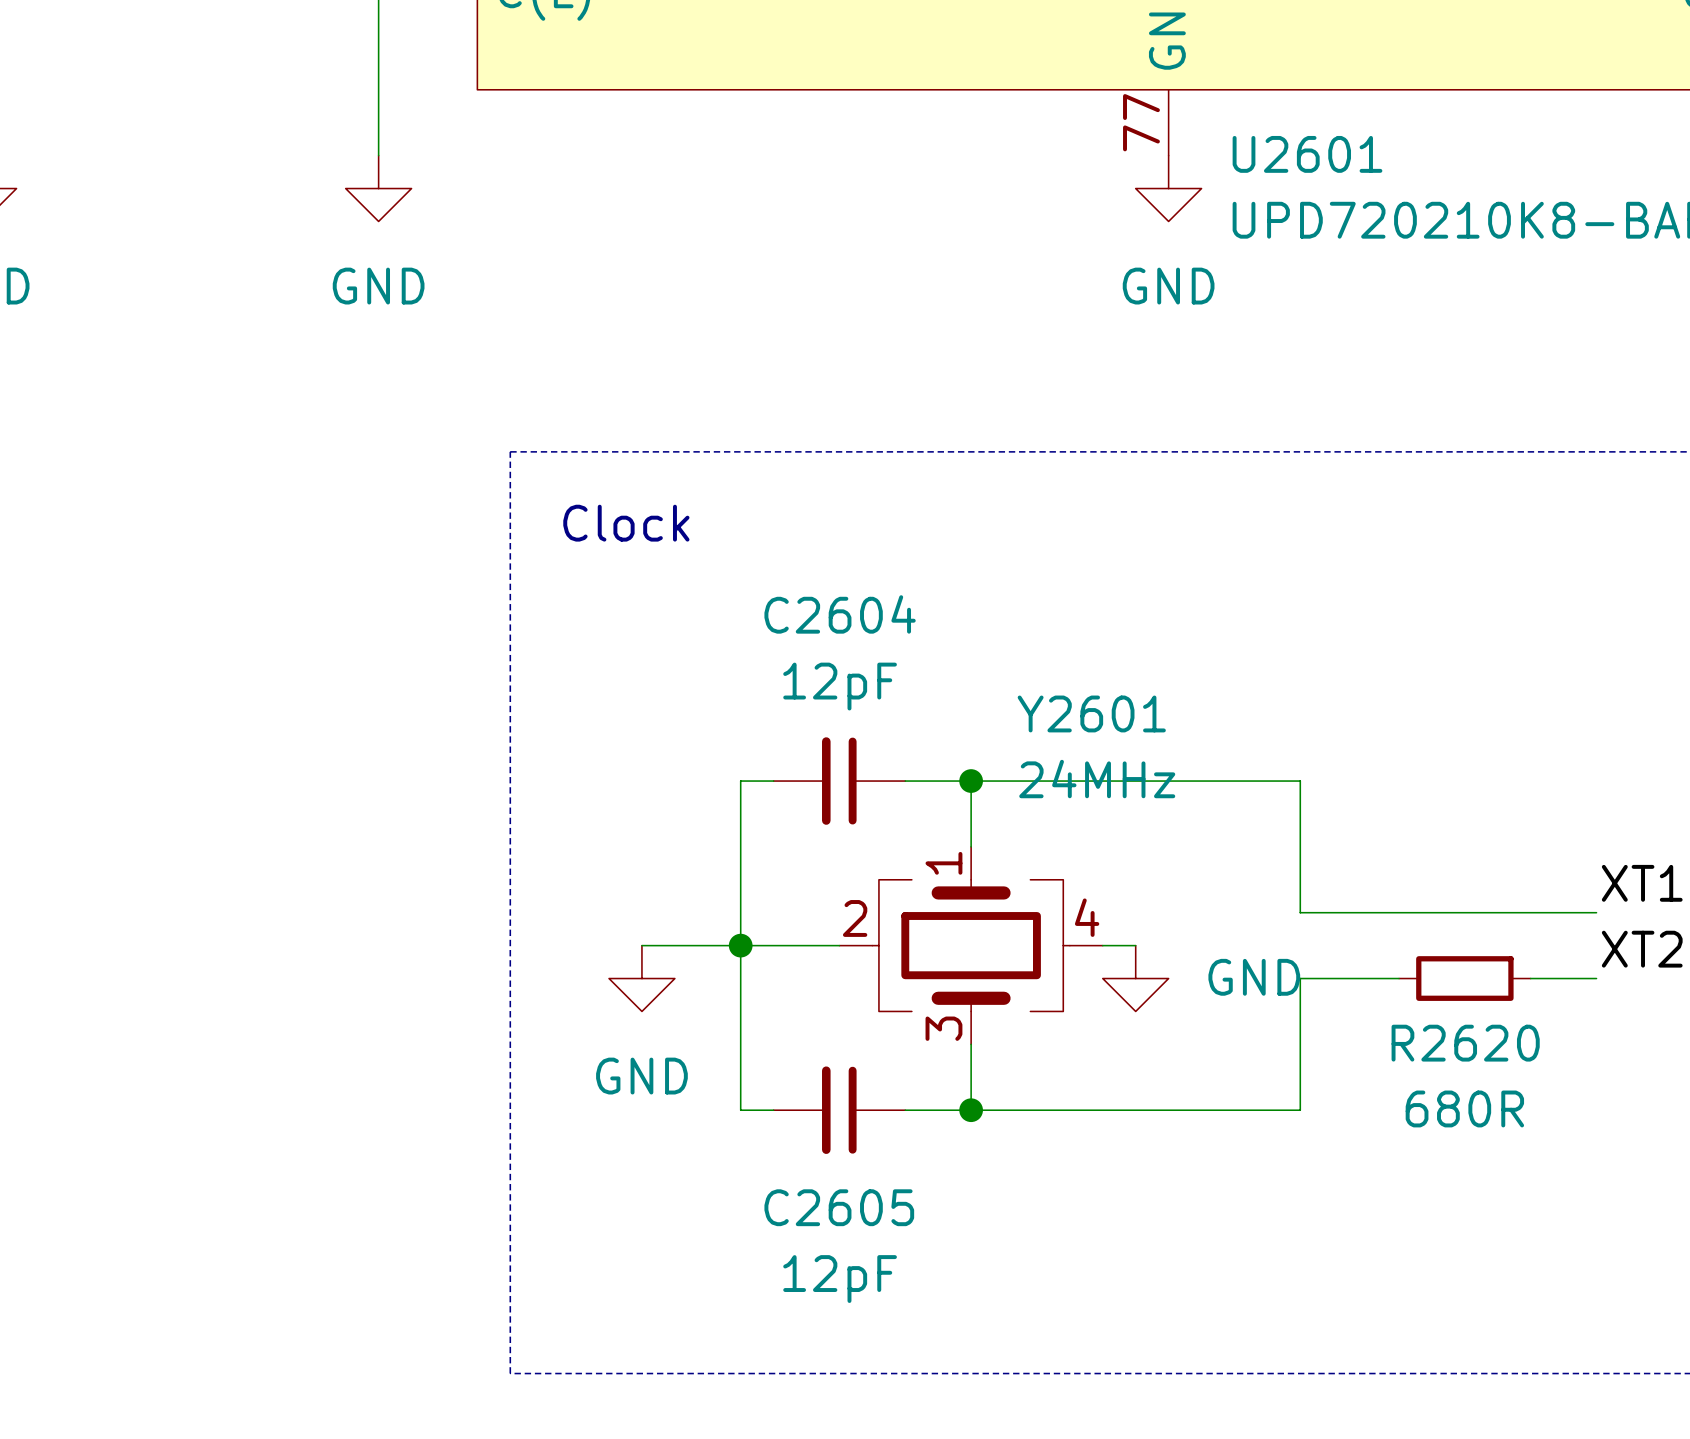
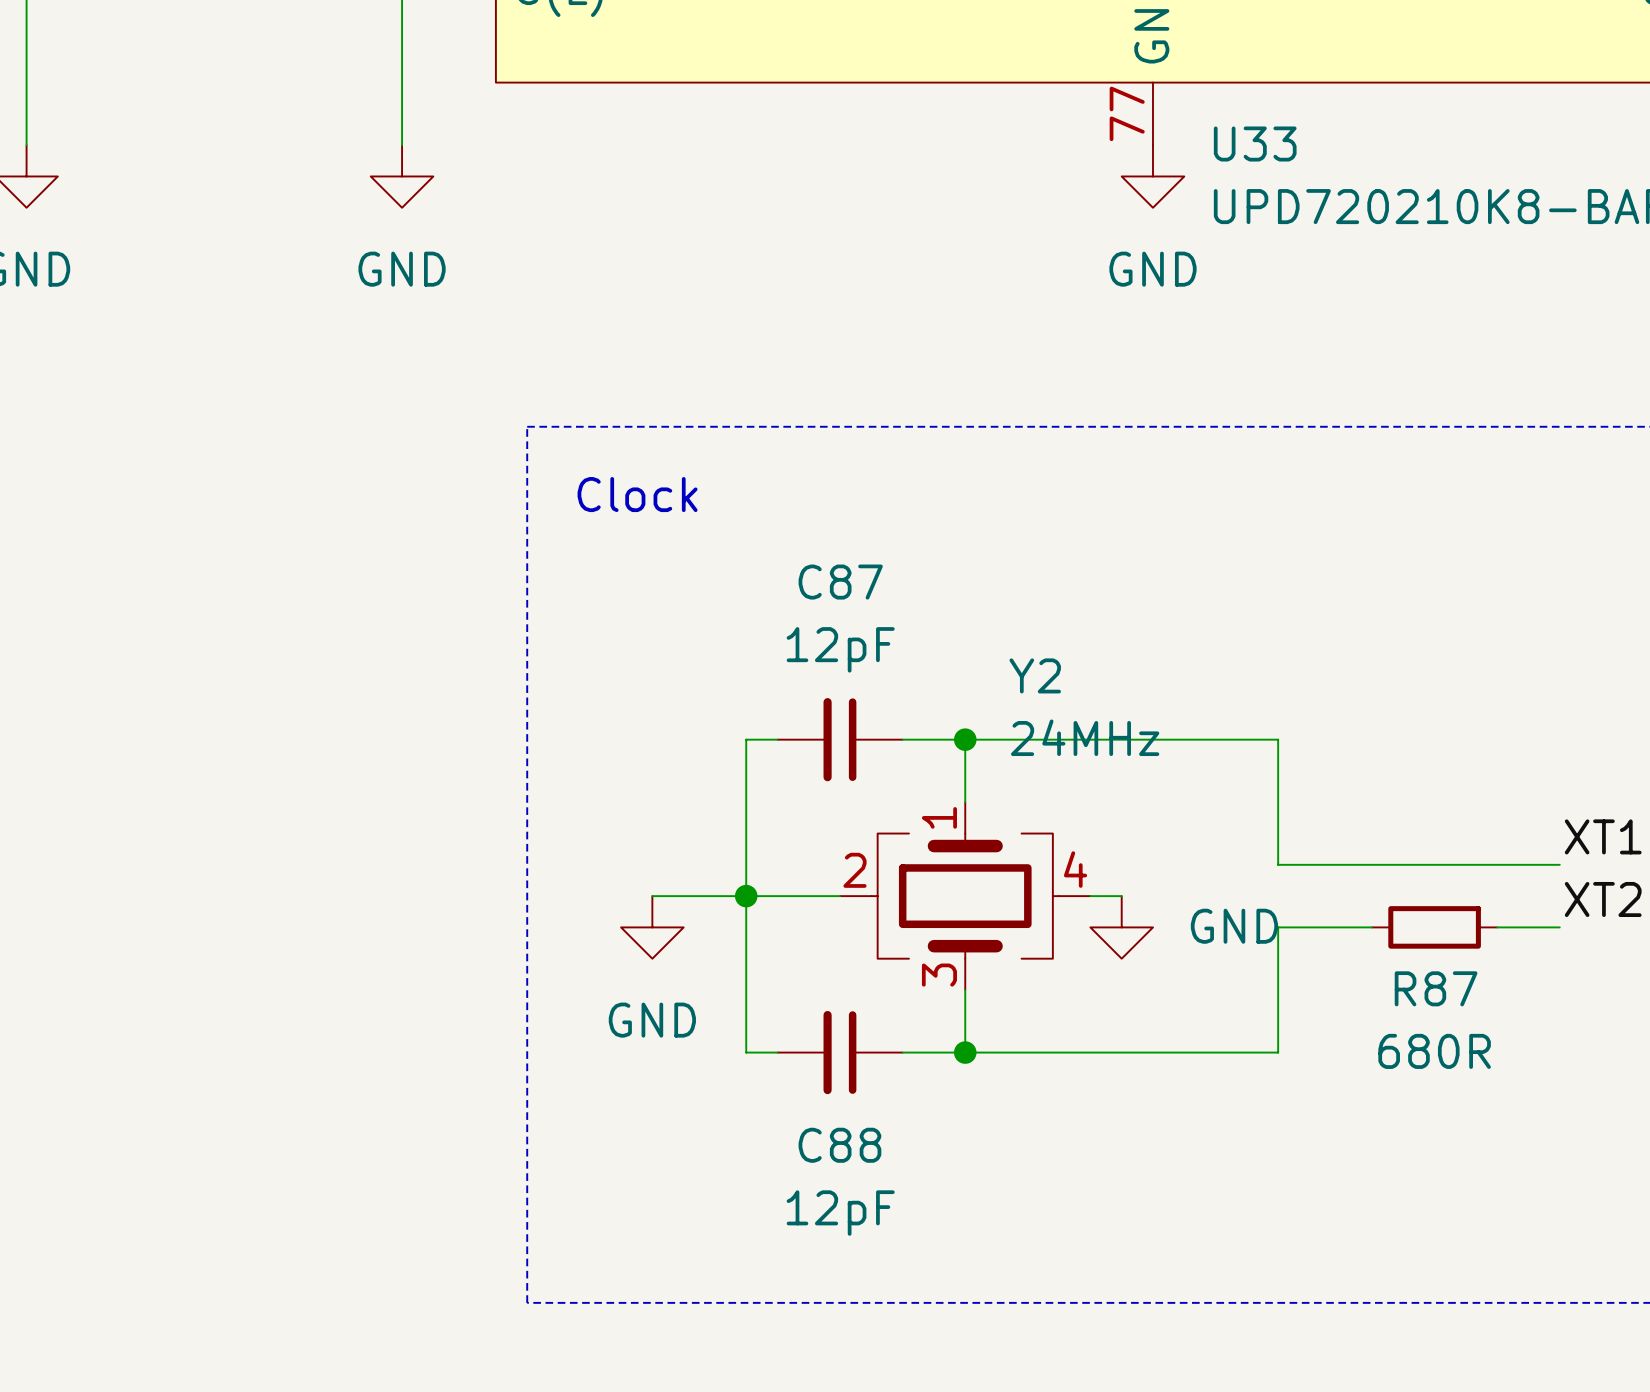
U2601 name: U2601 (1307, 154) -> U33 (1255, 144)
C2604 name: C2604 (840, 614) -> C87 (840, 582)
Y2601 name: Y2601 (1091, 713) -> Y2 (1035, 675)
R2620 name: R2620 (1465, 1043) -> R87 (1436, 988)
C2605 name: C2605 (839, 1207) -> C88 (839, 1145)

